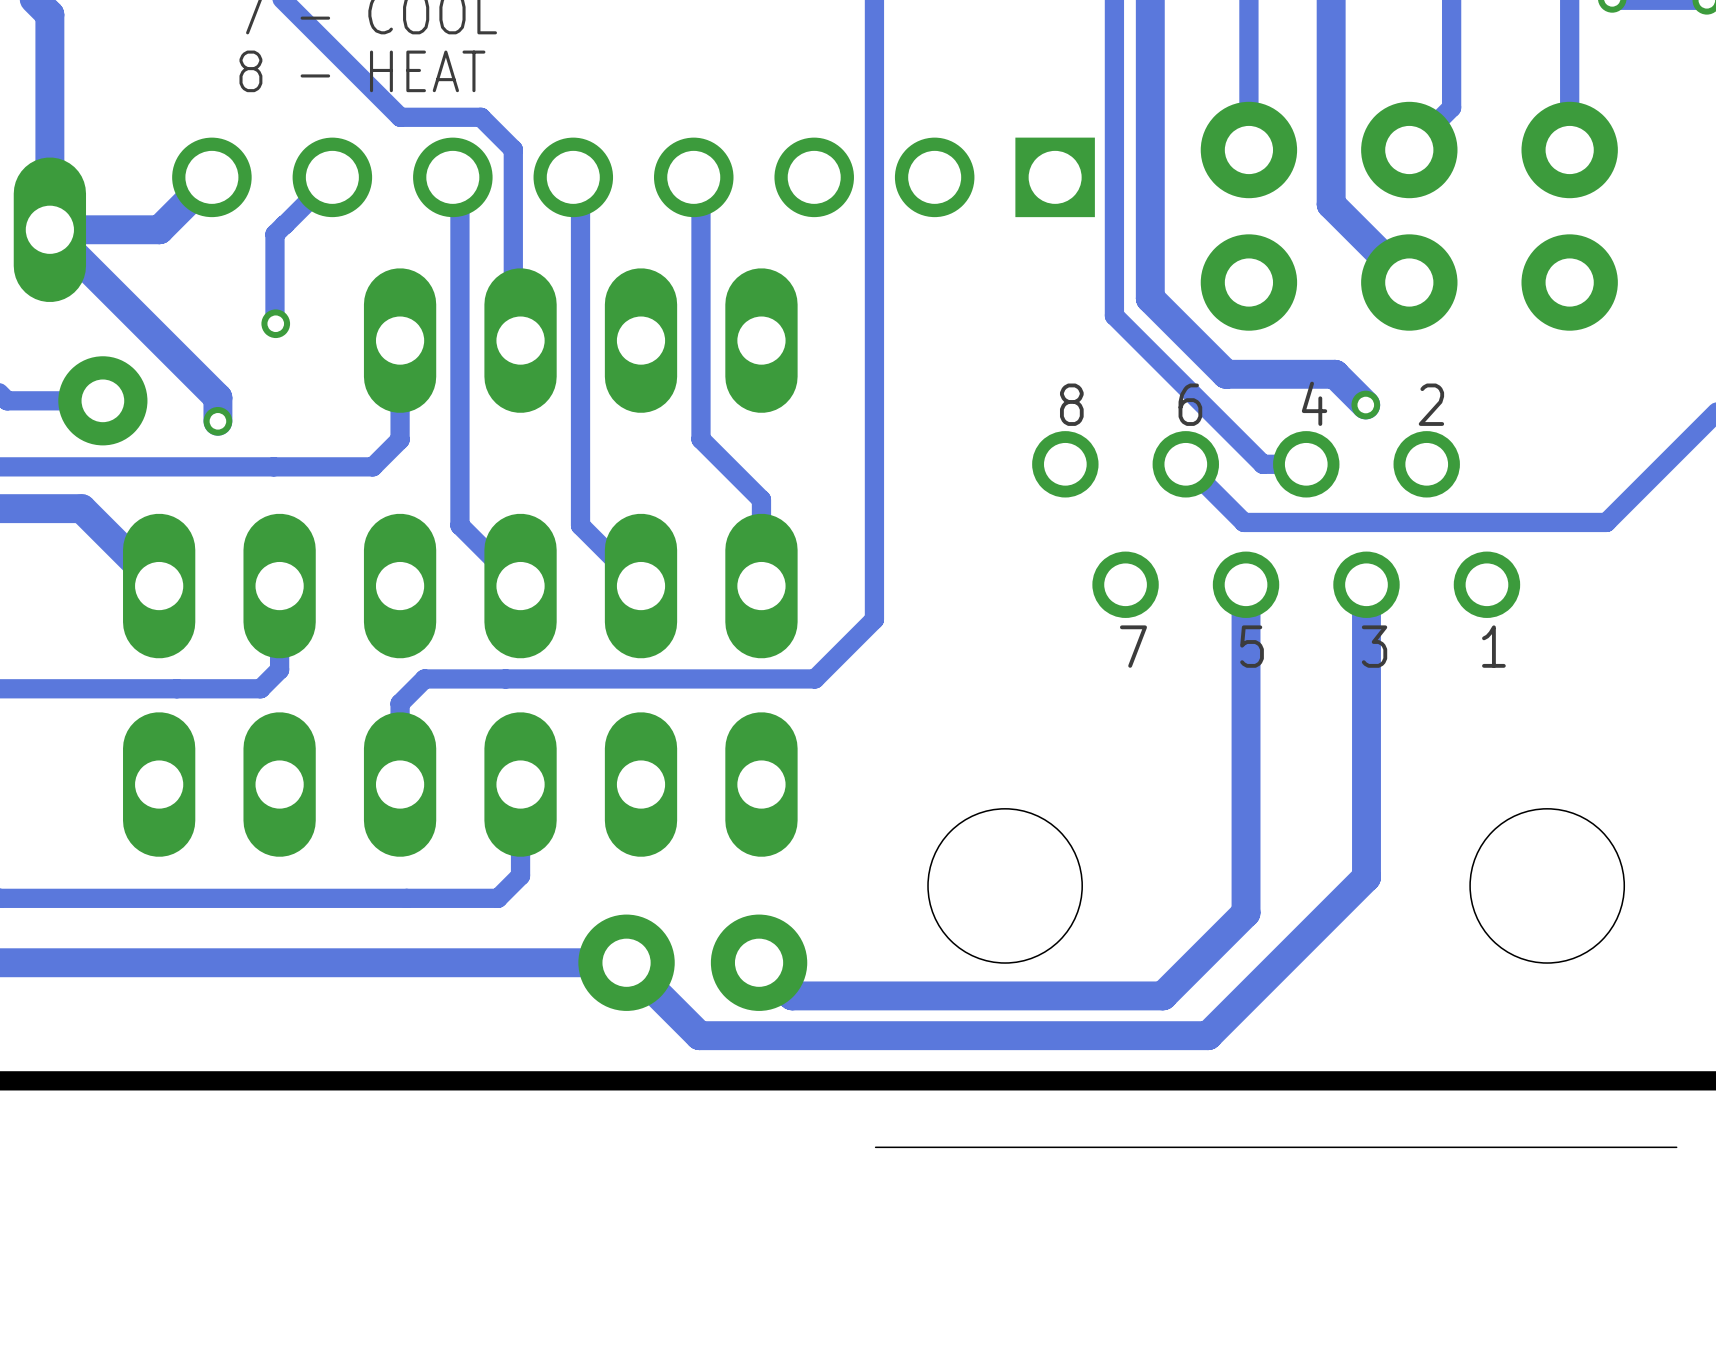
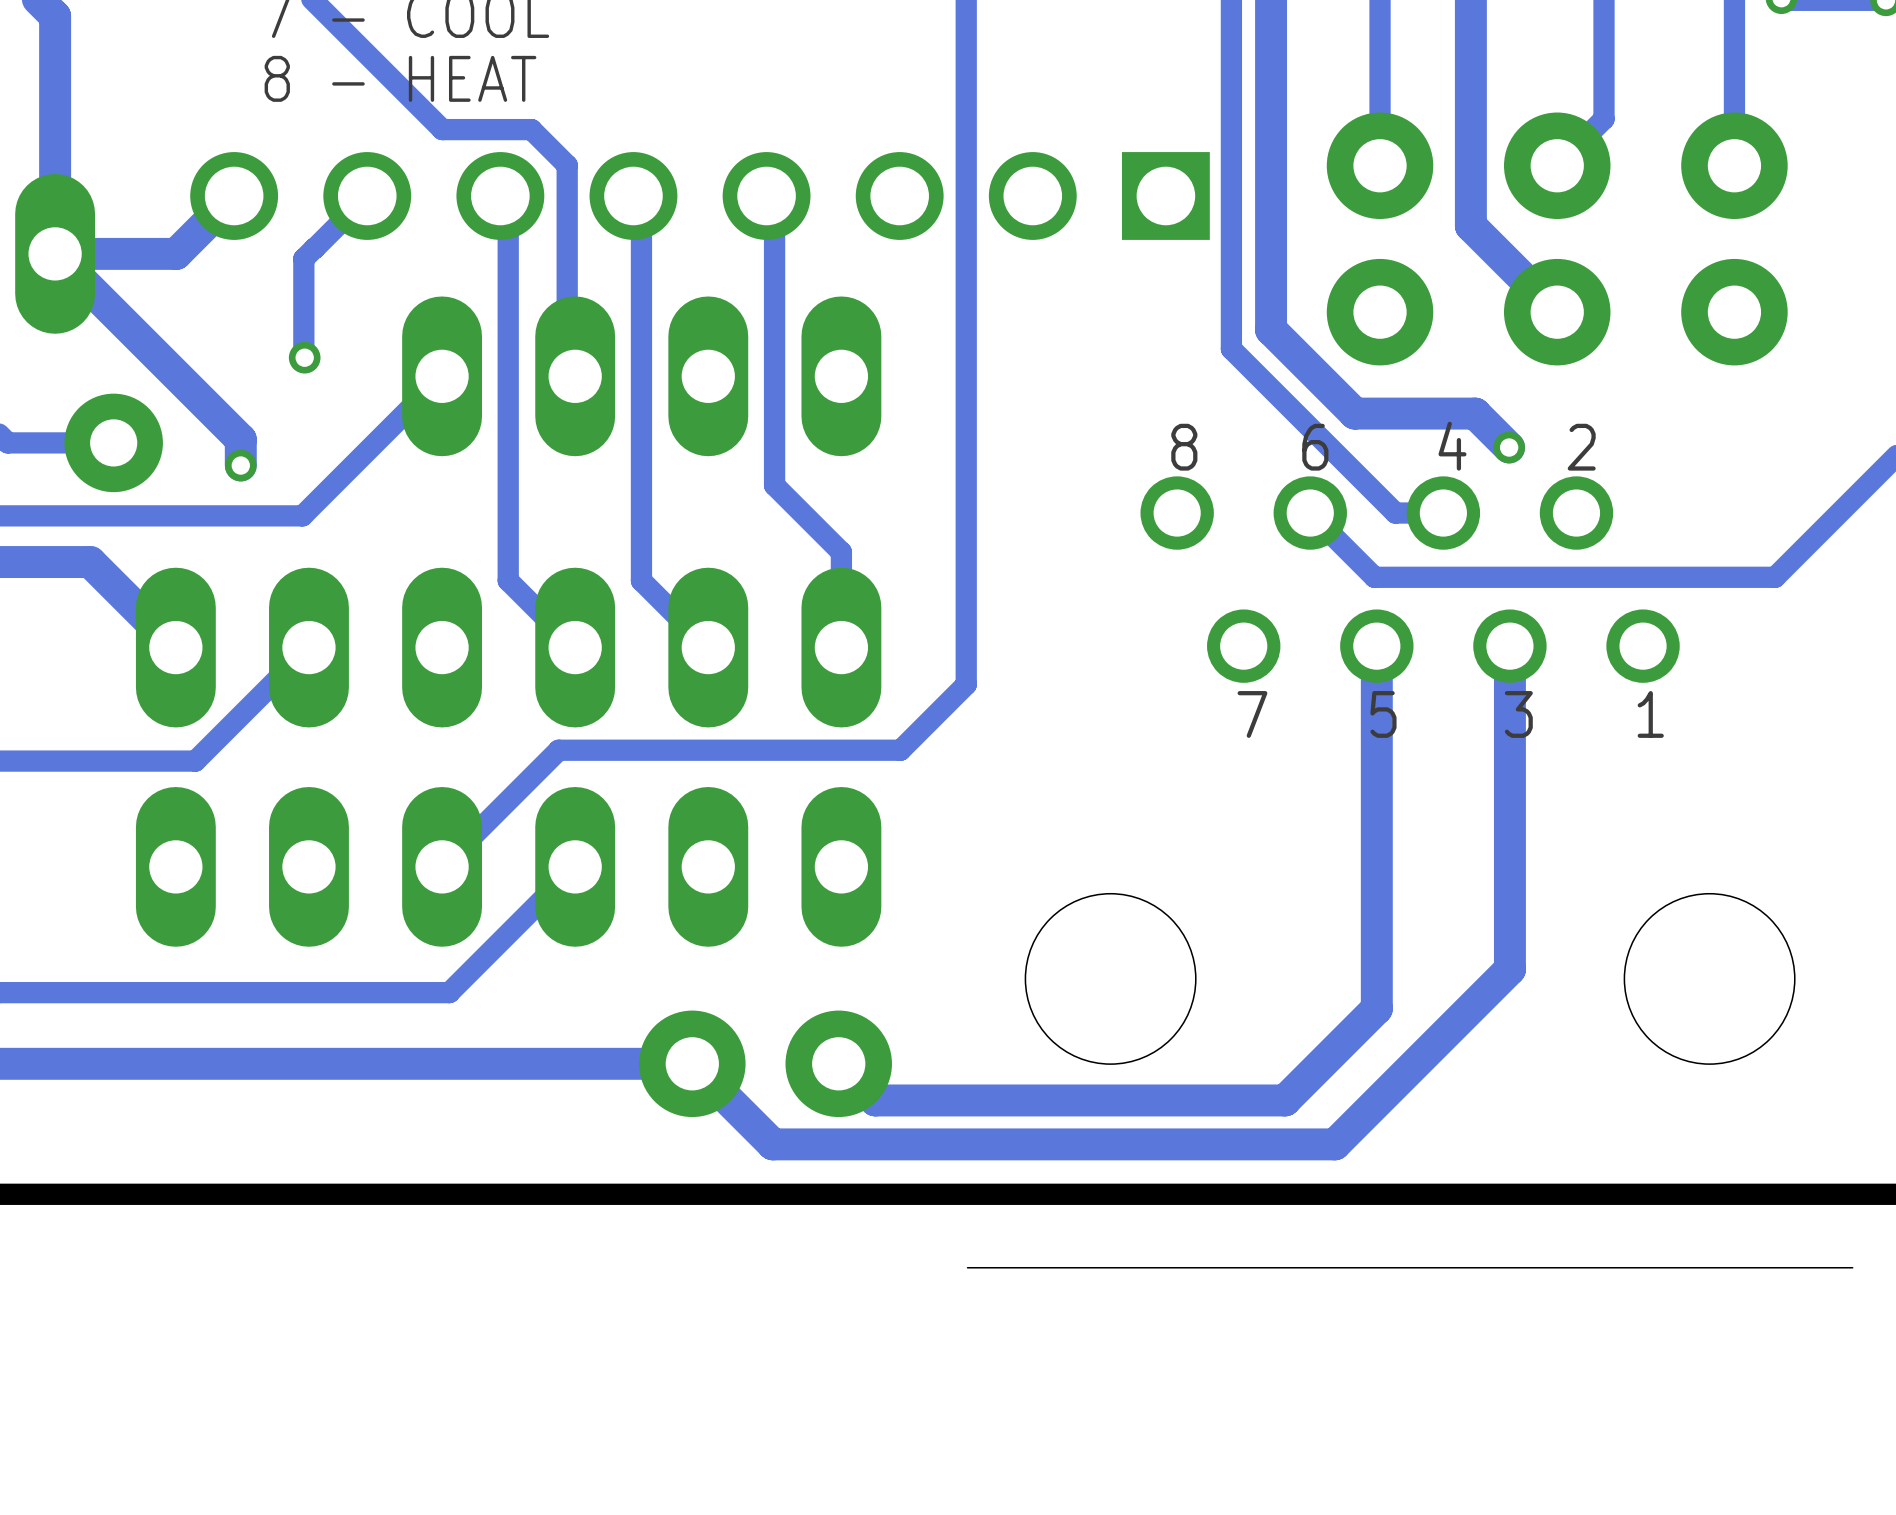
track: (400, 340) (400, 439) (372, 466) (273, 466) -> (442, 376) (302, 515)
track: (279, 586) (279, 669) (260, 688) (176, 688) -> (308, 647) (195, 761)
track: (505, 678) (424, 678) (400, 703) (400, 784) -> (558, 750) (442, 866)
track: (520, 784) (520, 875) (498, 898) (406, 898) -> (575, 866) (449, 992)

